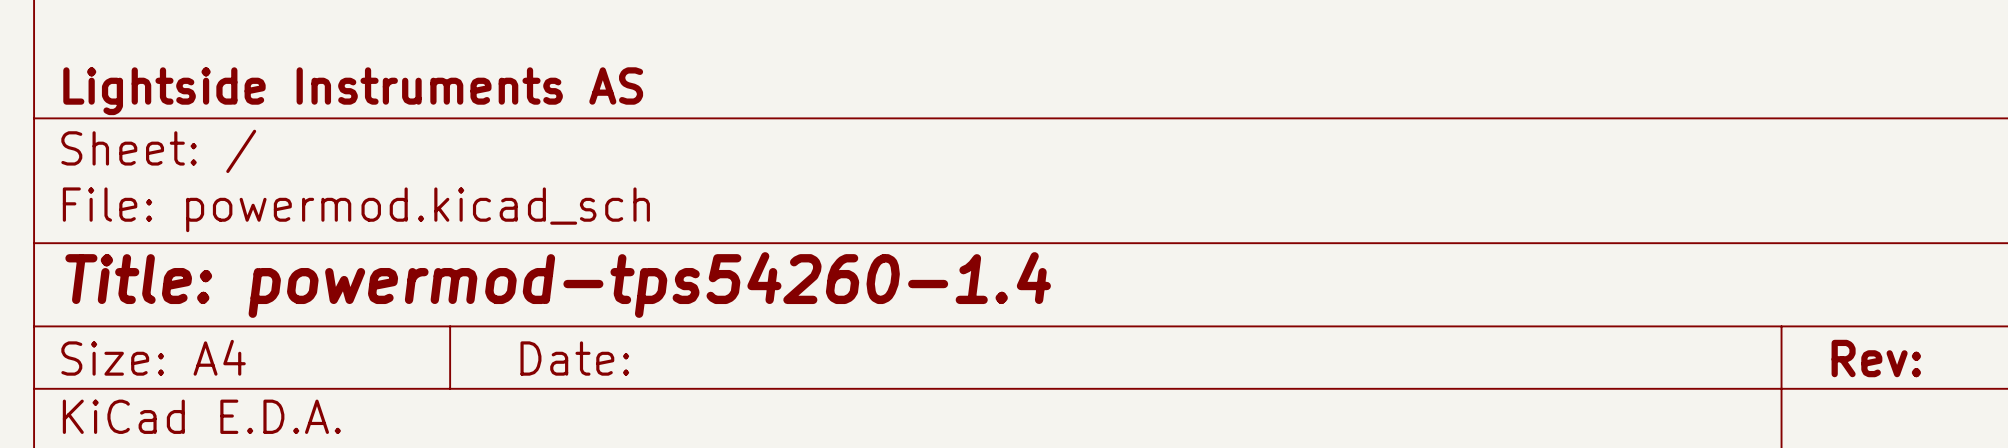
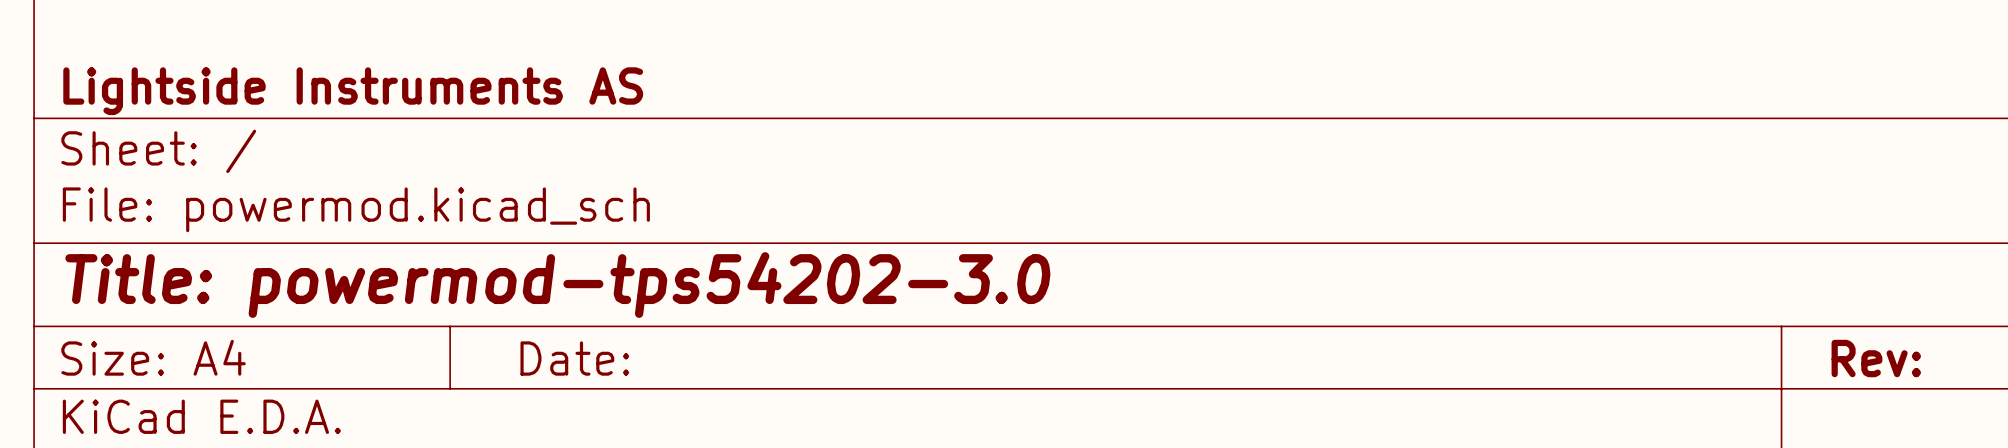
title block: Title: powermod-tps54260-1.4 (558, 285) -> Title: powermod-tps54202-3.0 (557, 285)

